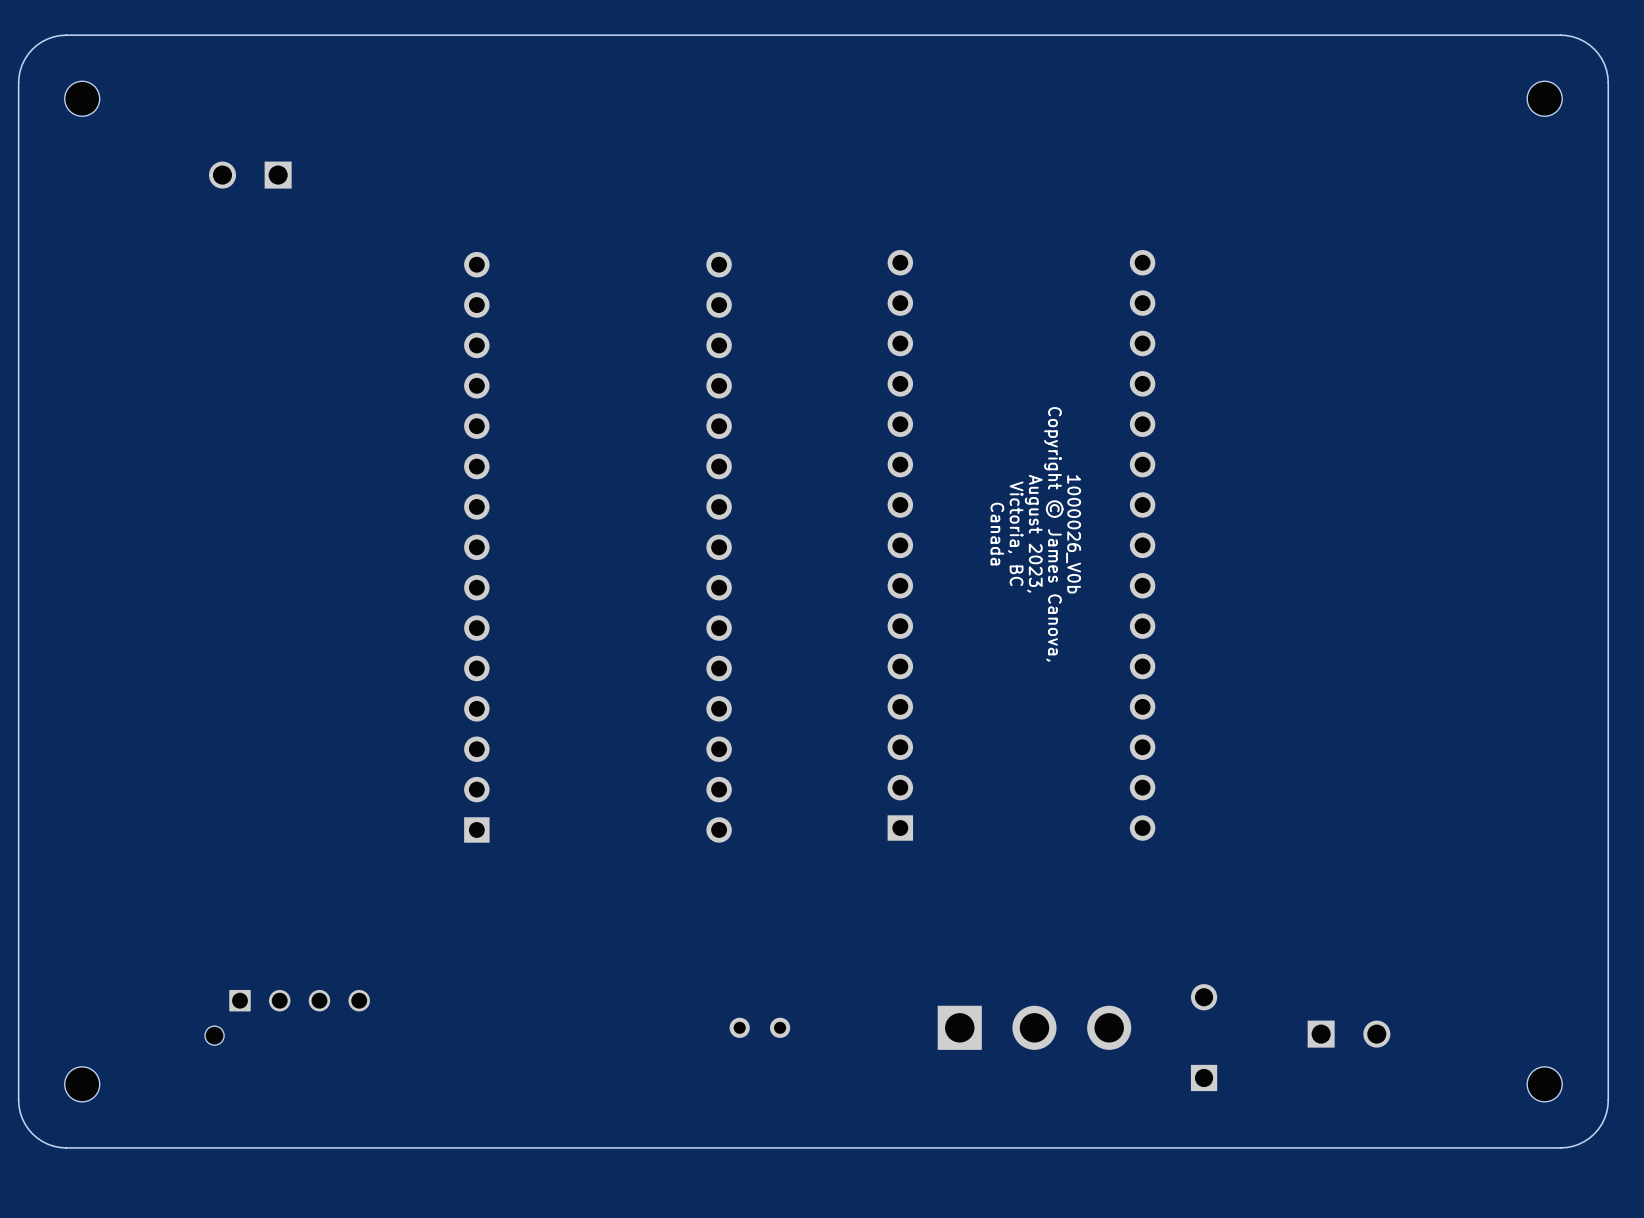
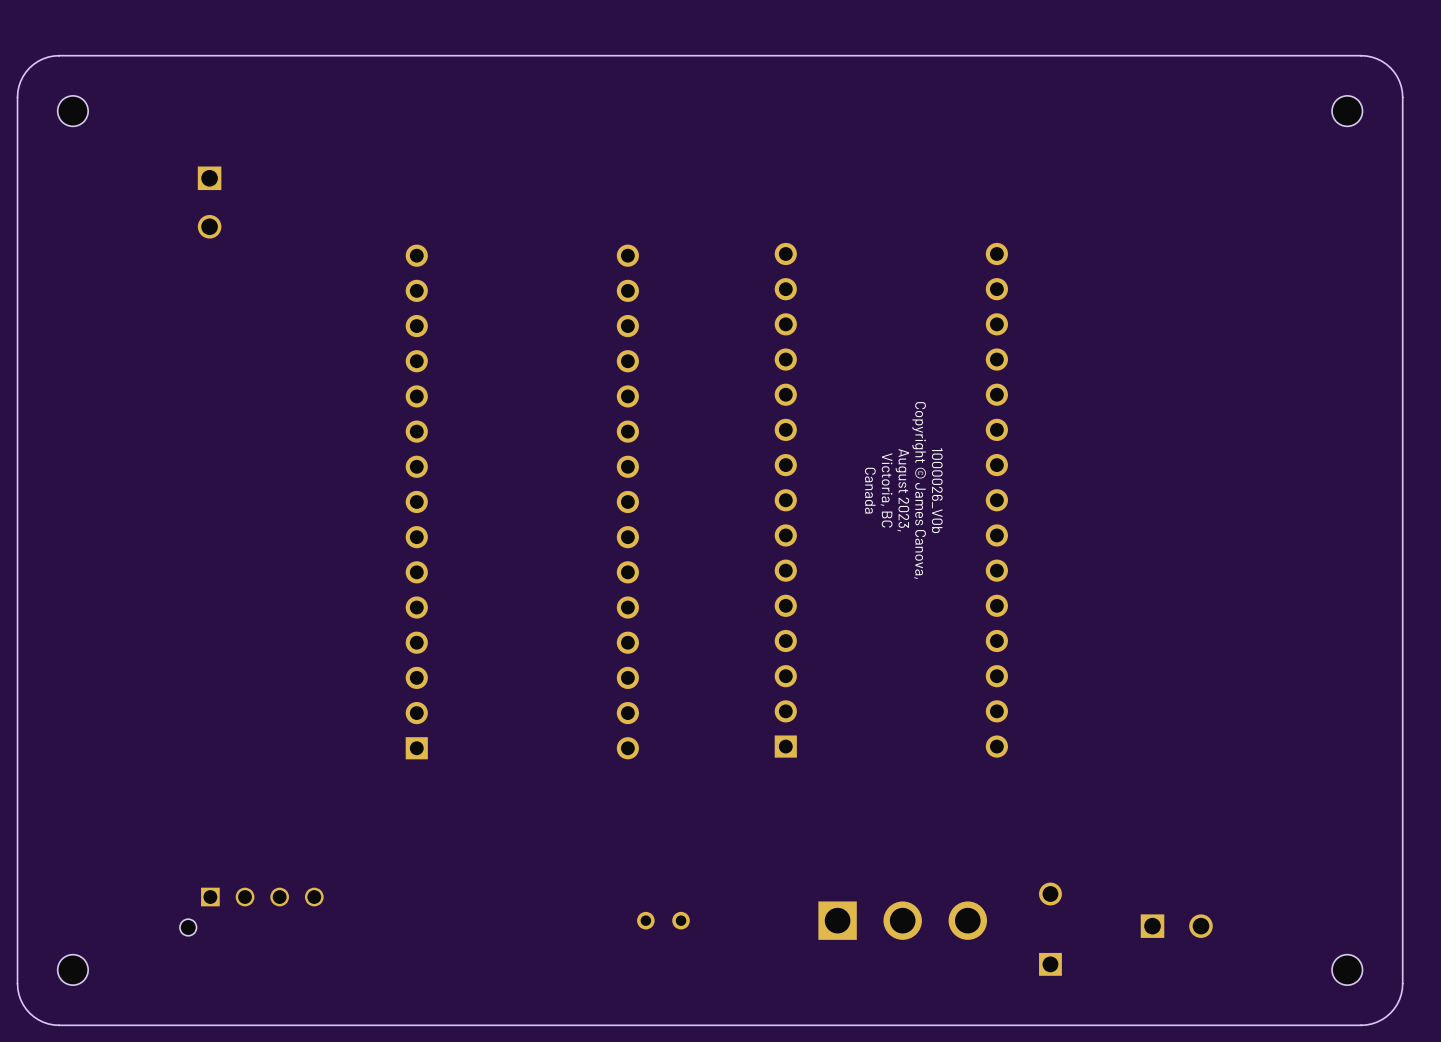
part rotation: 0° (250, 175) -> 90° counterclockwise (209, 202)

